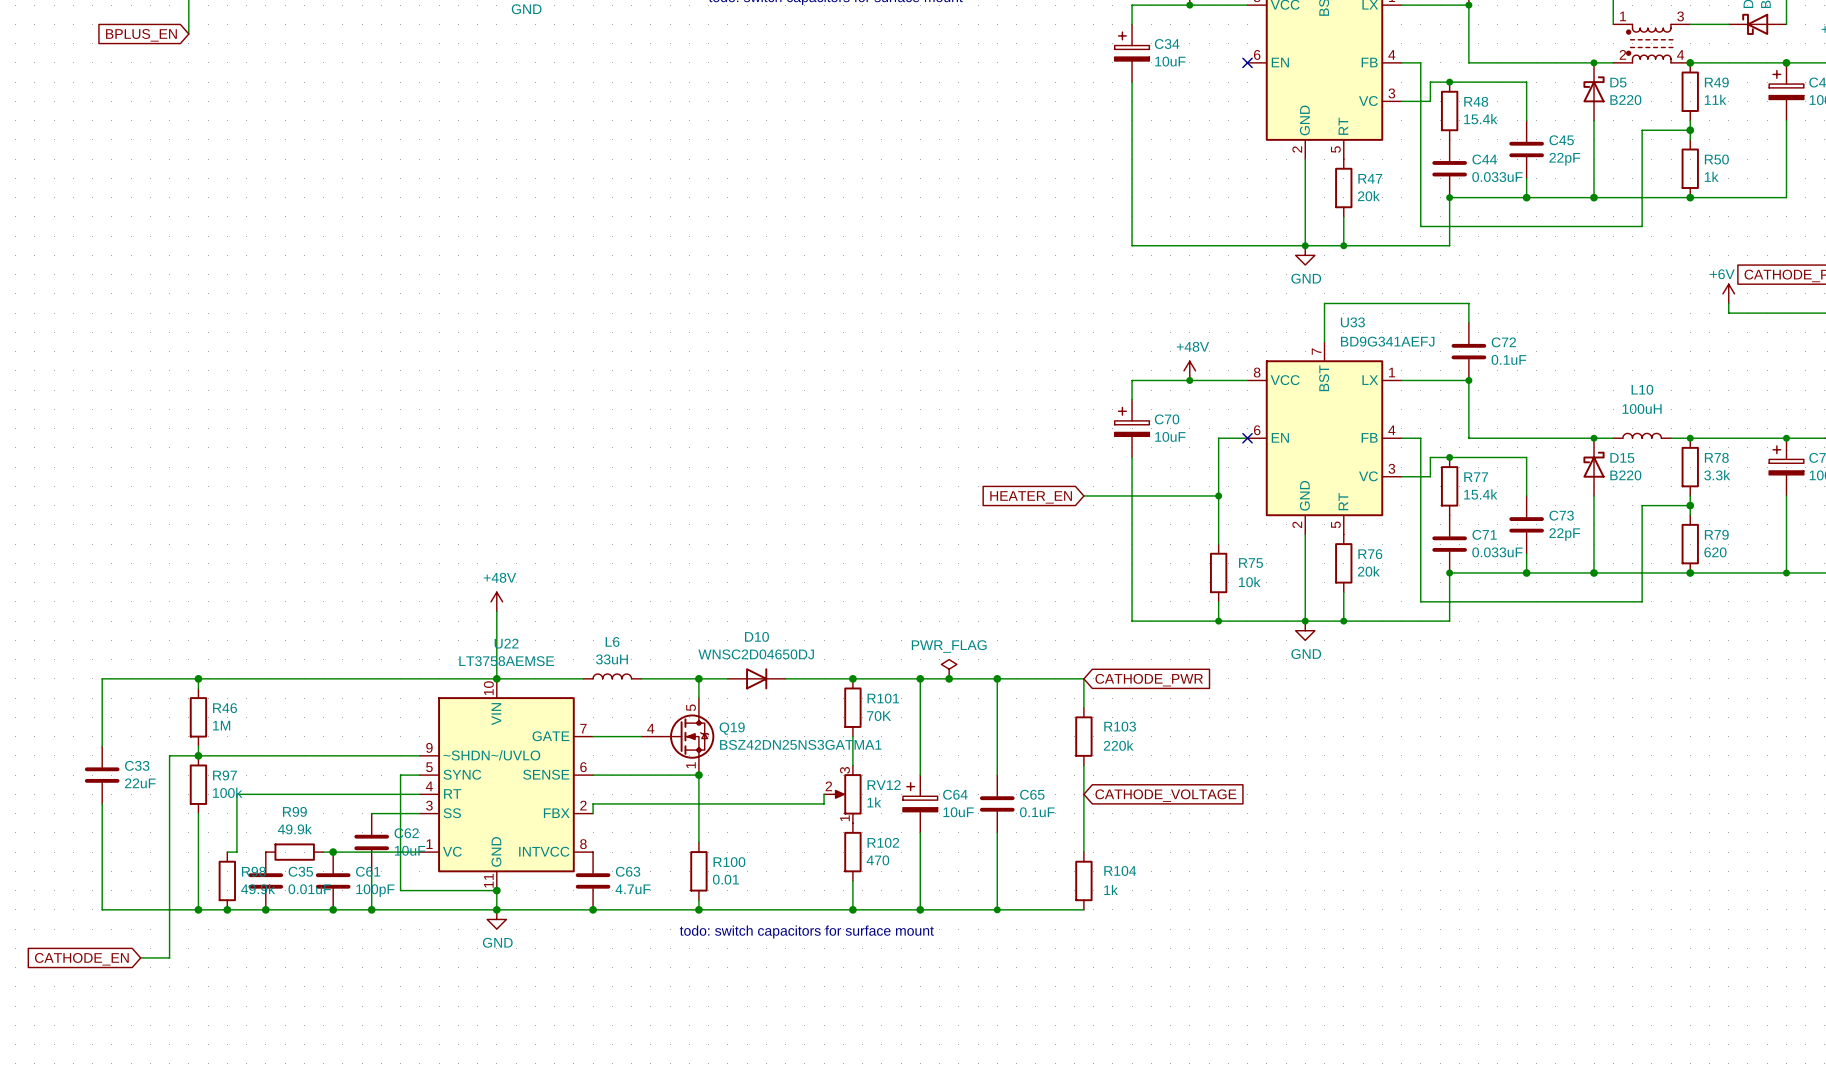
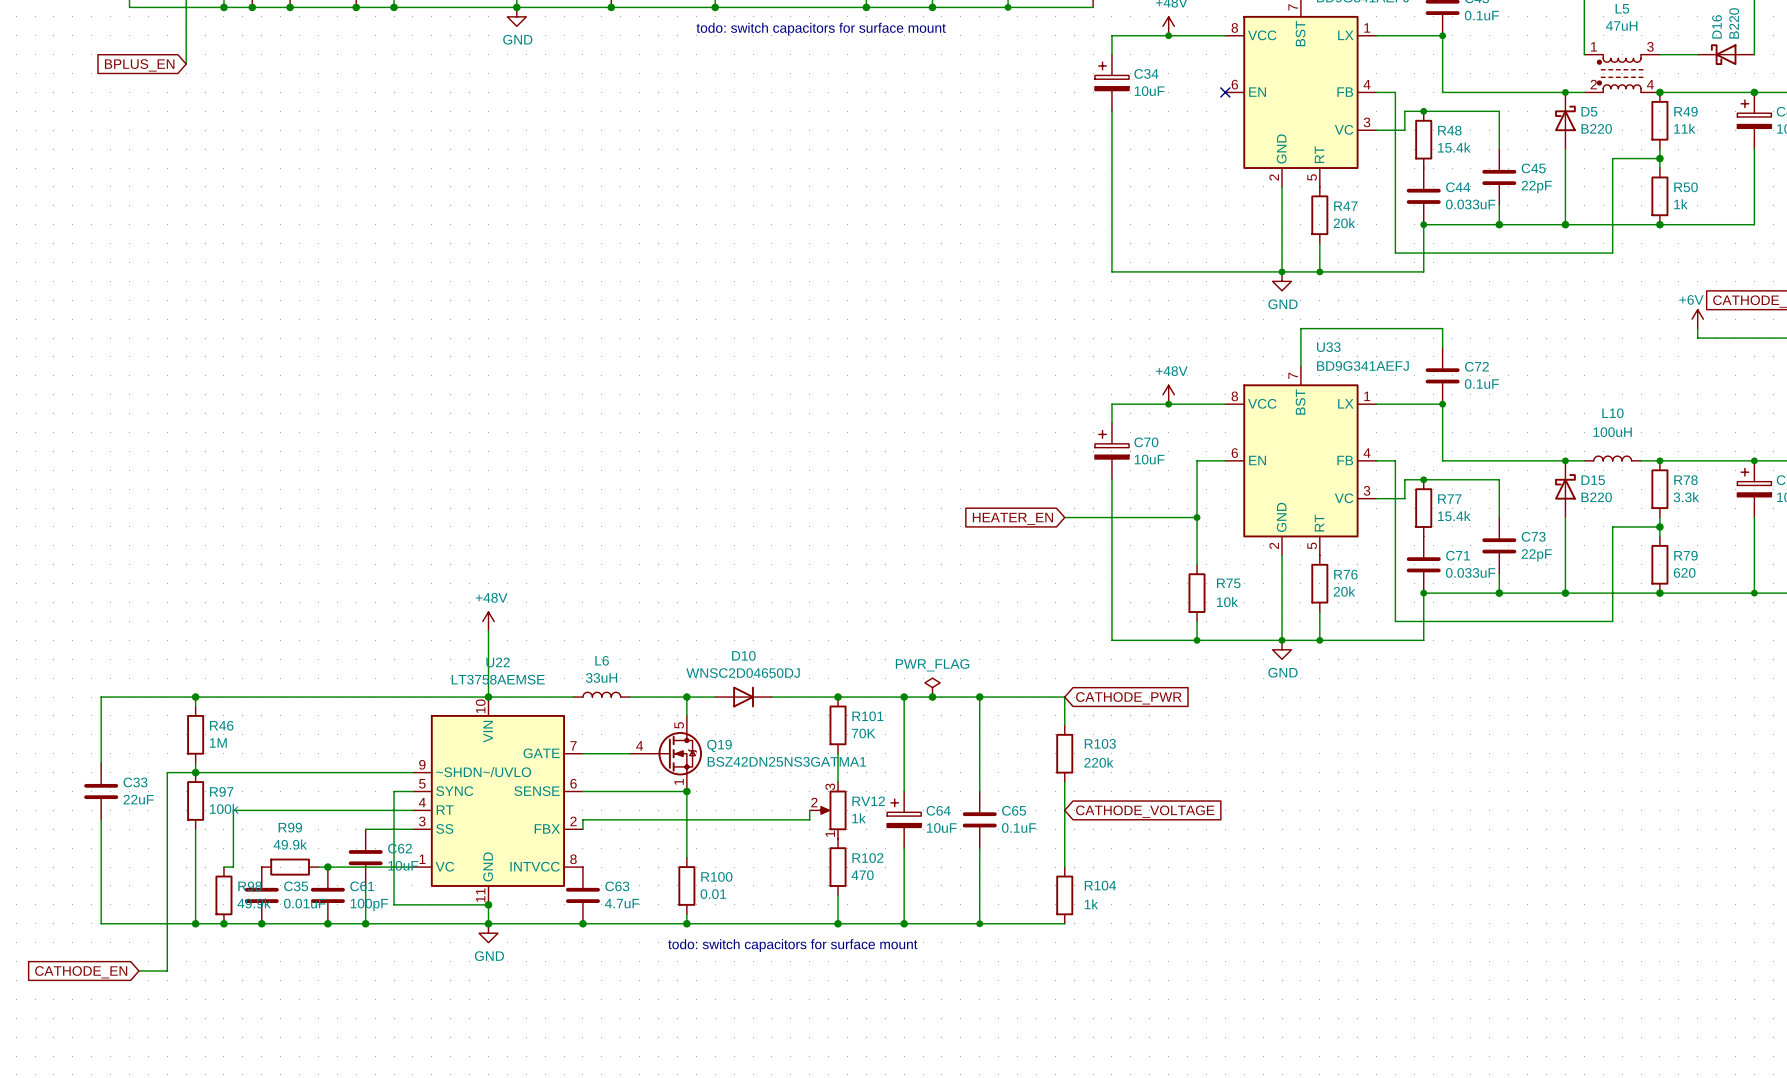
no-connect mark: (1247, 438) -> none

